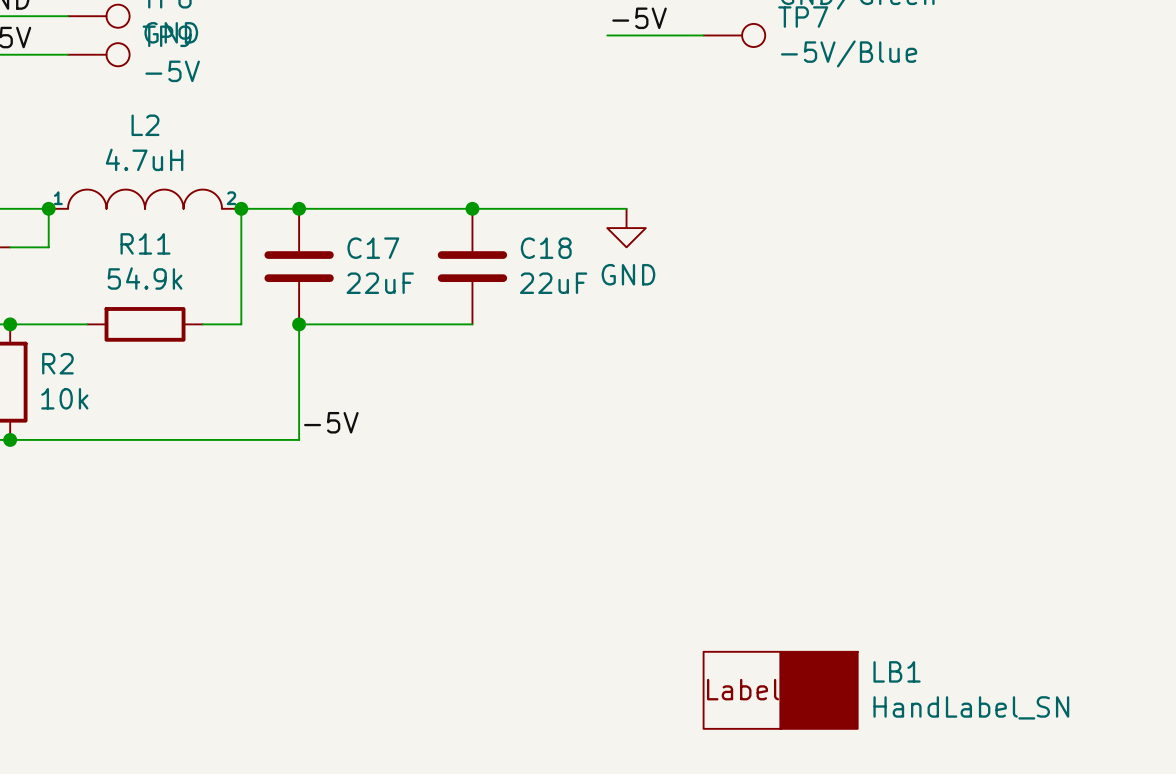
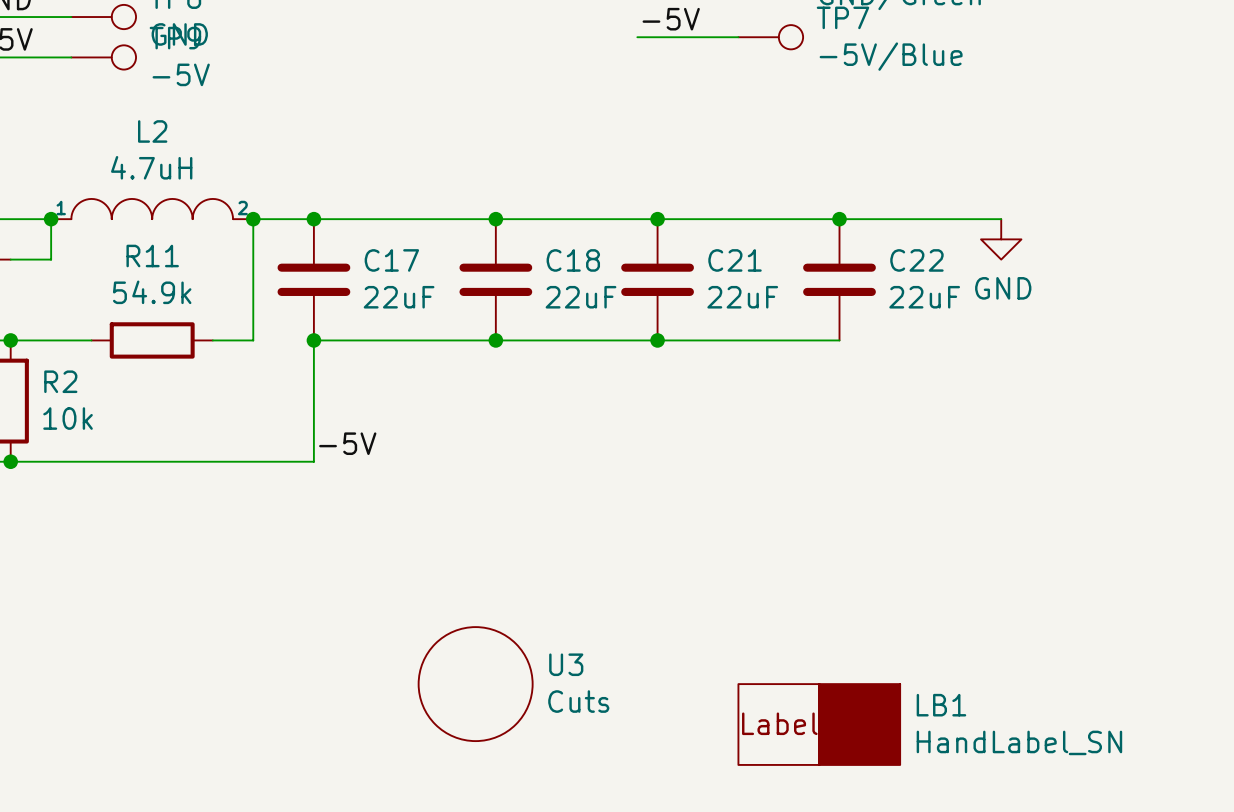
wire: none -> (657, 219) (1001, 219)
junction: none -> (657, 219)
junction: none -> (839, 219)
power symbol position: GND (626, 228) -> GND (1001, 239)
C21: none -> 22uF (657, 279)
C22: none -> 22uF (839, 279)
wire: none -> (495, 340) (839, 340)
junction: none -> (495, 340)
junction: none -> (657, 340)
U3: none -> Cuts (475, 684)

